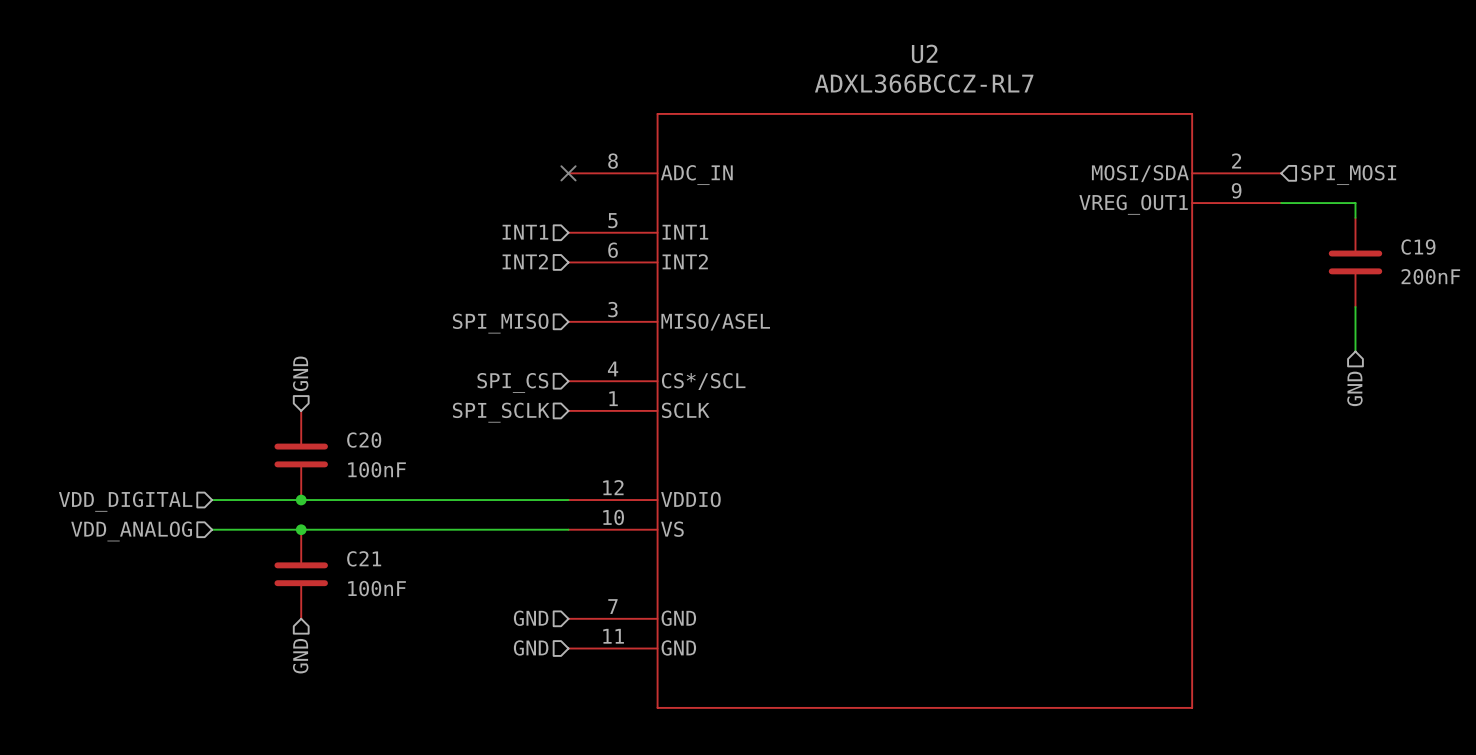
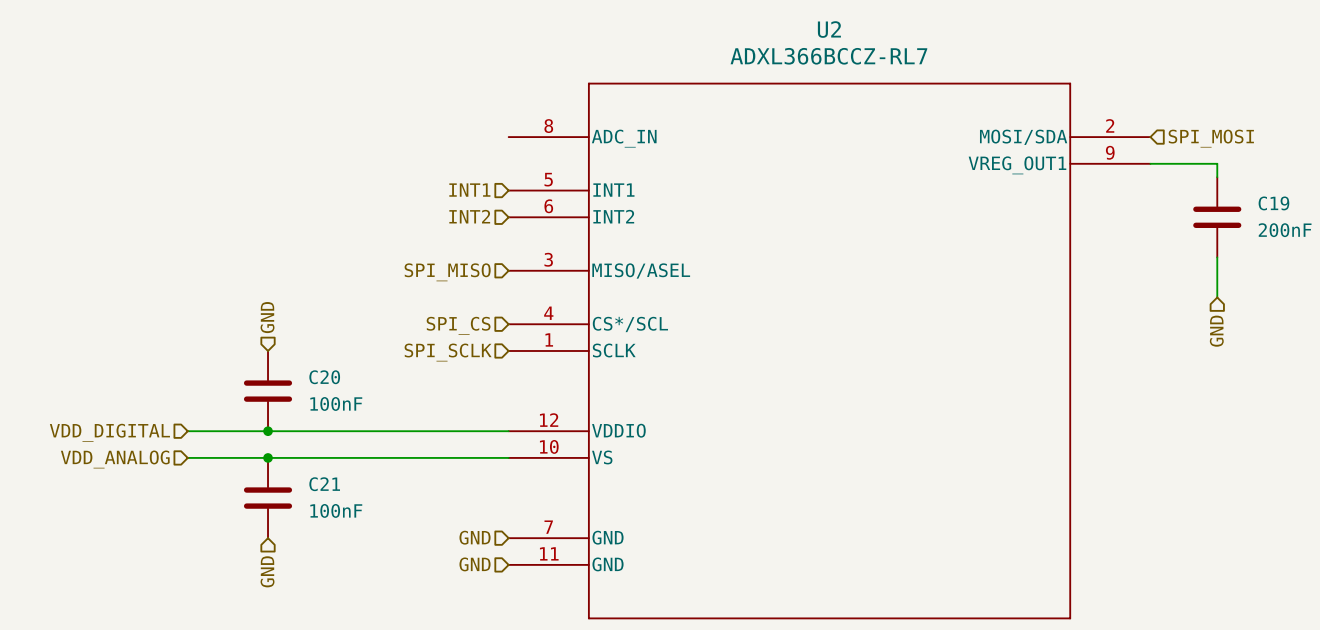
no-connect mark: (568, 173) -> none

